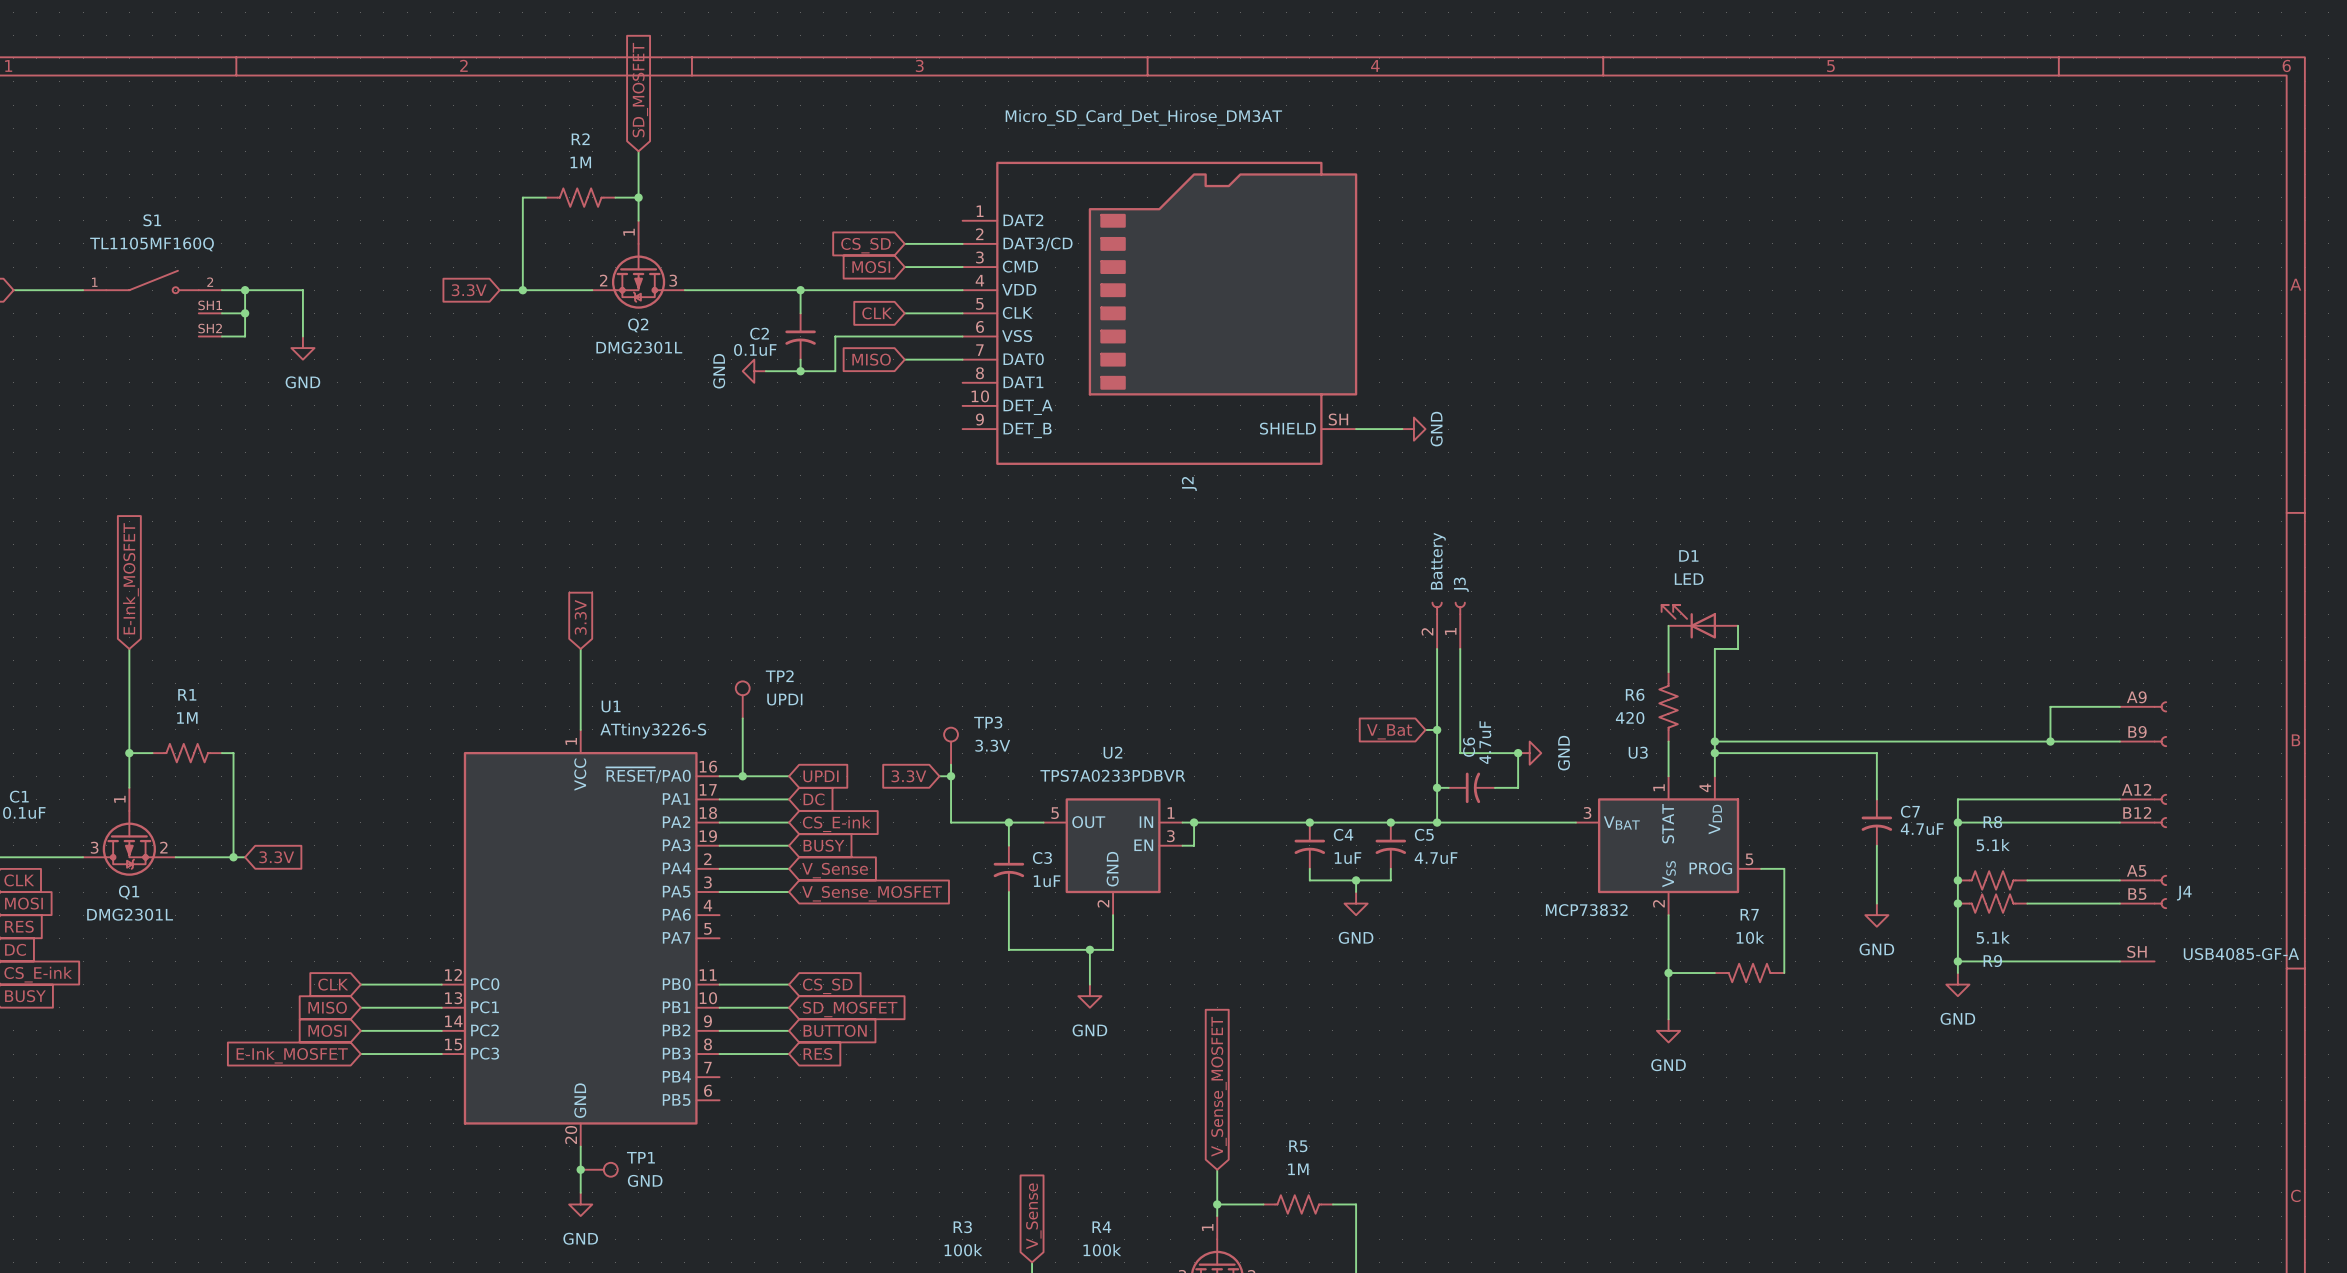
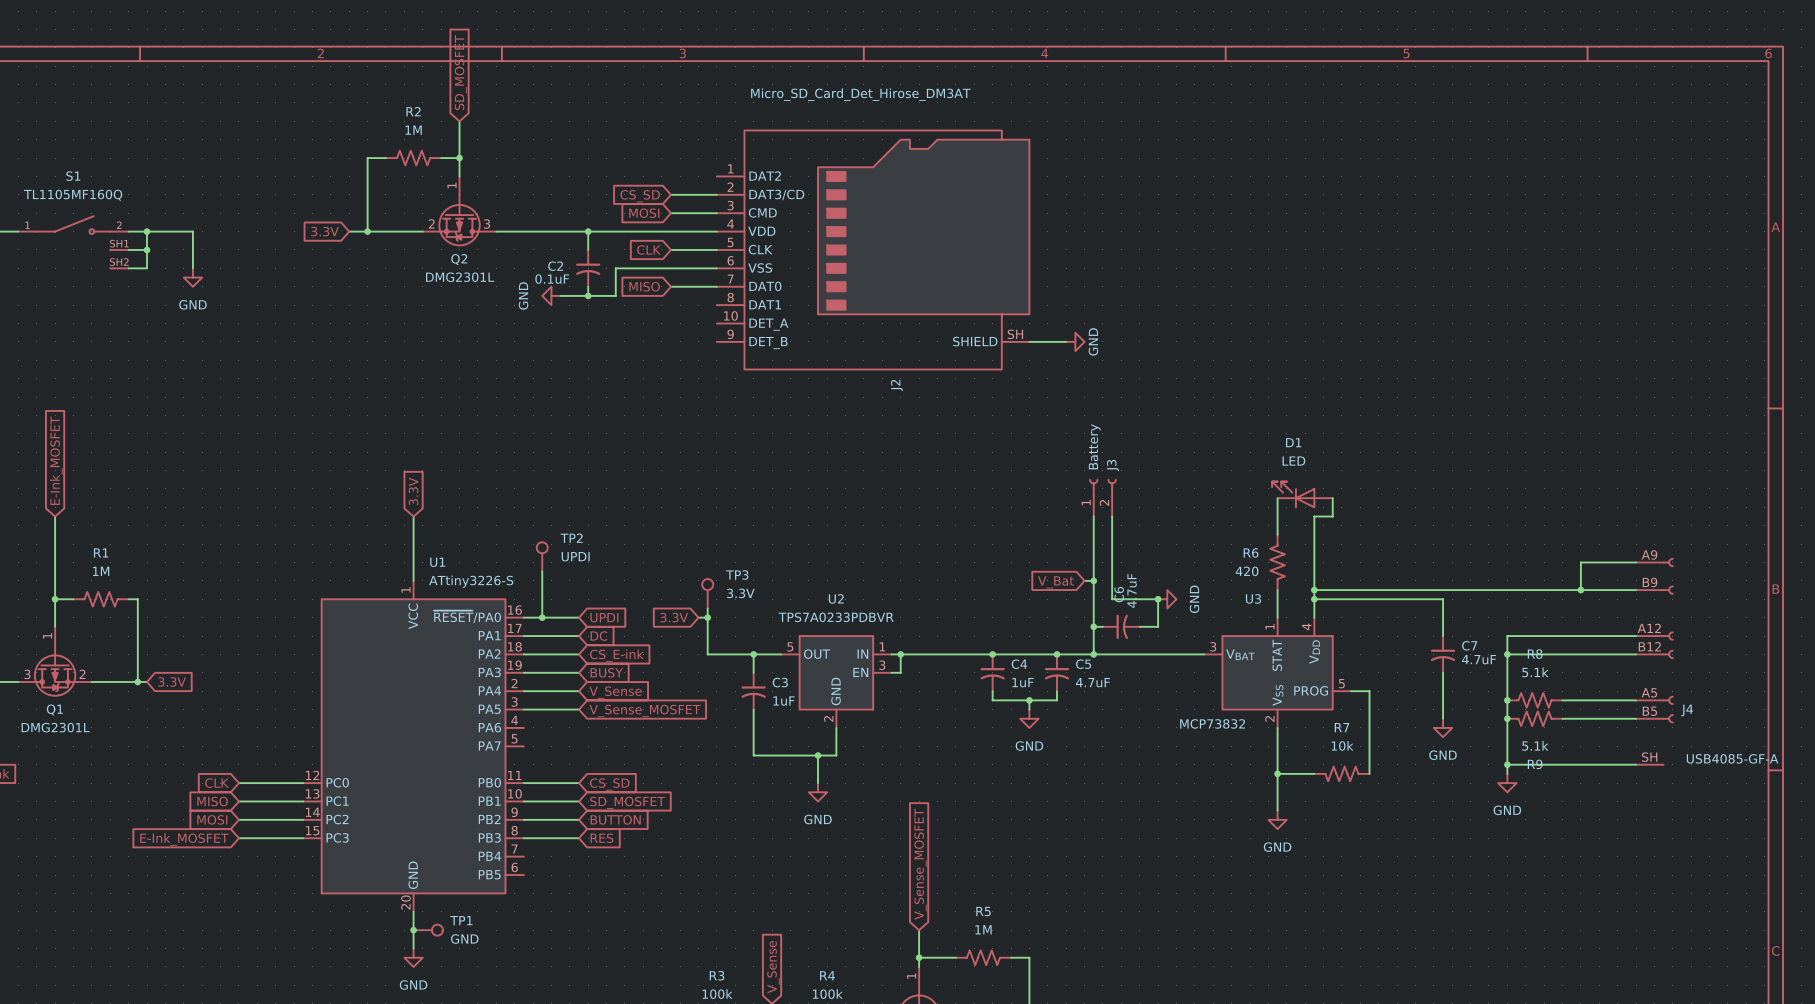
J3 flip: as is (1448, 608) -> left-right (1102, 484)

